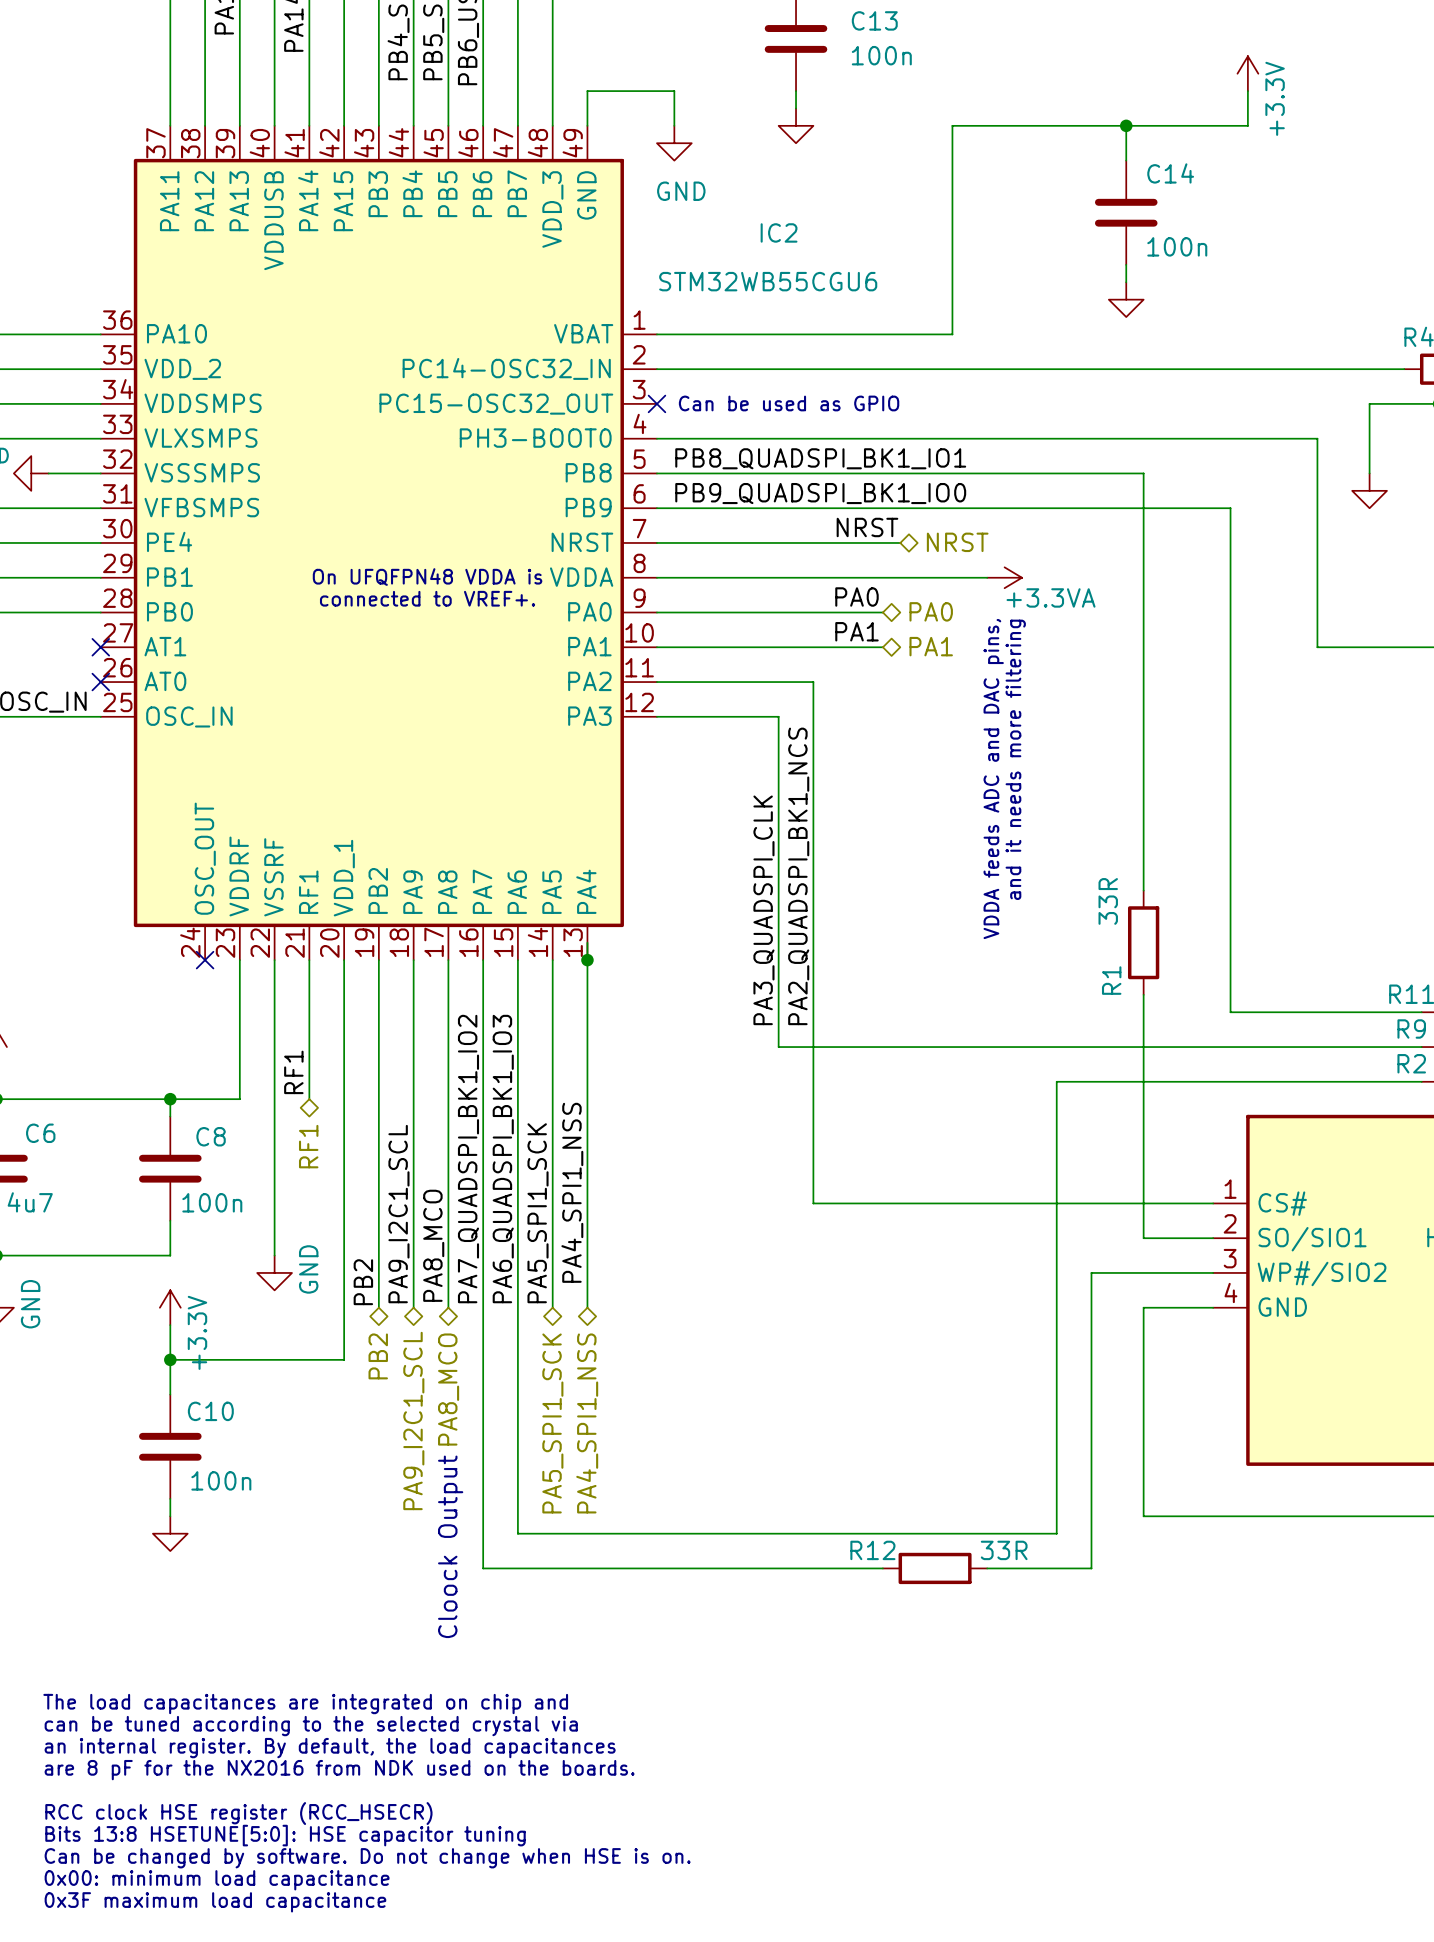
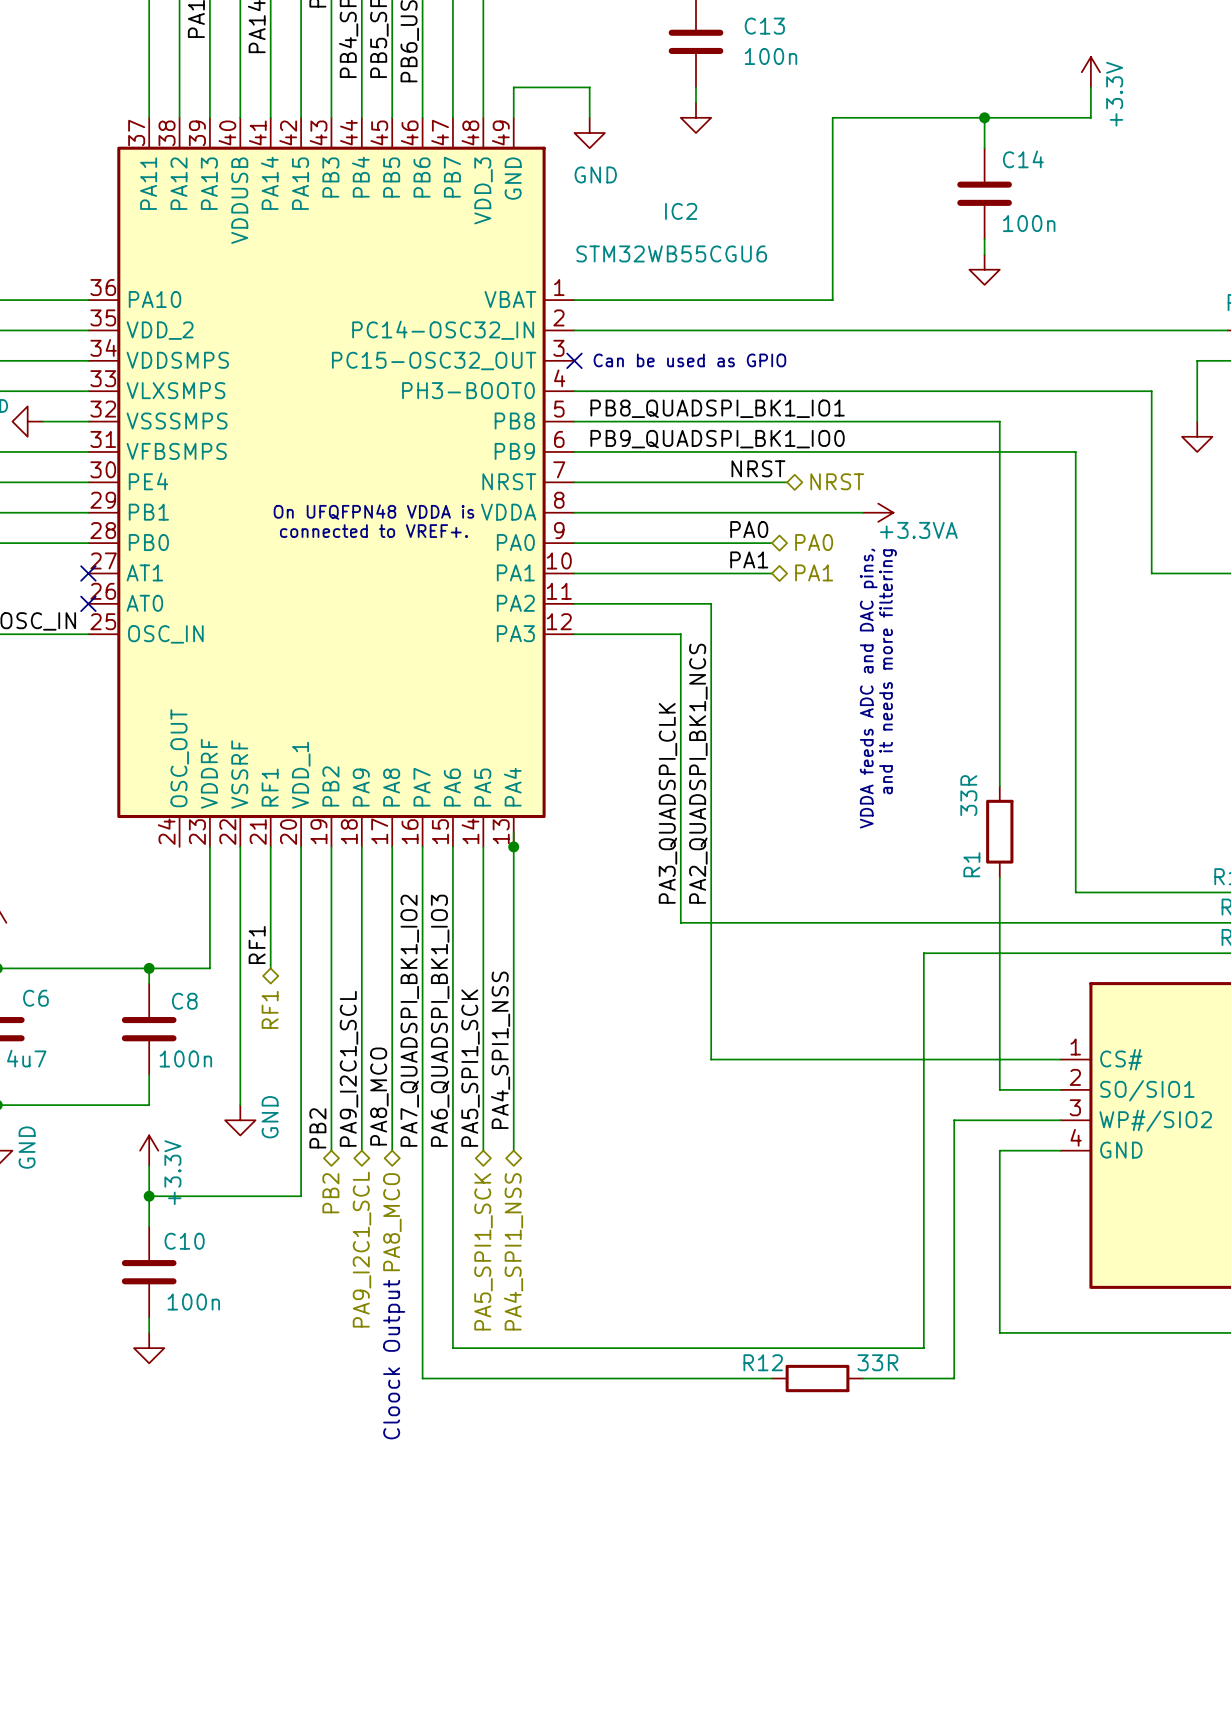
no-connect mark: (205, 960) -> none
text: The load capacitances are integrated on chip and (305, 1704) -> none
text: can be tuned according to the selected crystal via (311, 1726) -> none
text: an internal register. By default, the load capacitances (330, 1748) -> none
text: are 8 pF for the NX2016 from NDK used on the boards. (339, 1770) -> none
text: RCC clock HSE register (RCC_HSECR) (238, 1813) -> none
text: Bits 13:8 HSETUNE[5:0]: HSE capacitor tuning (285, 1835) -> none
text: Can be changed by software. Do not change when HSE is on. (367, 1858) -> none
text: 0x00: minimum load capacitance (217, 1880) -> none
text: 0x3F maximum load capacitance (215, 1902) -> none

